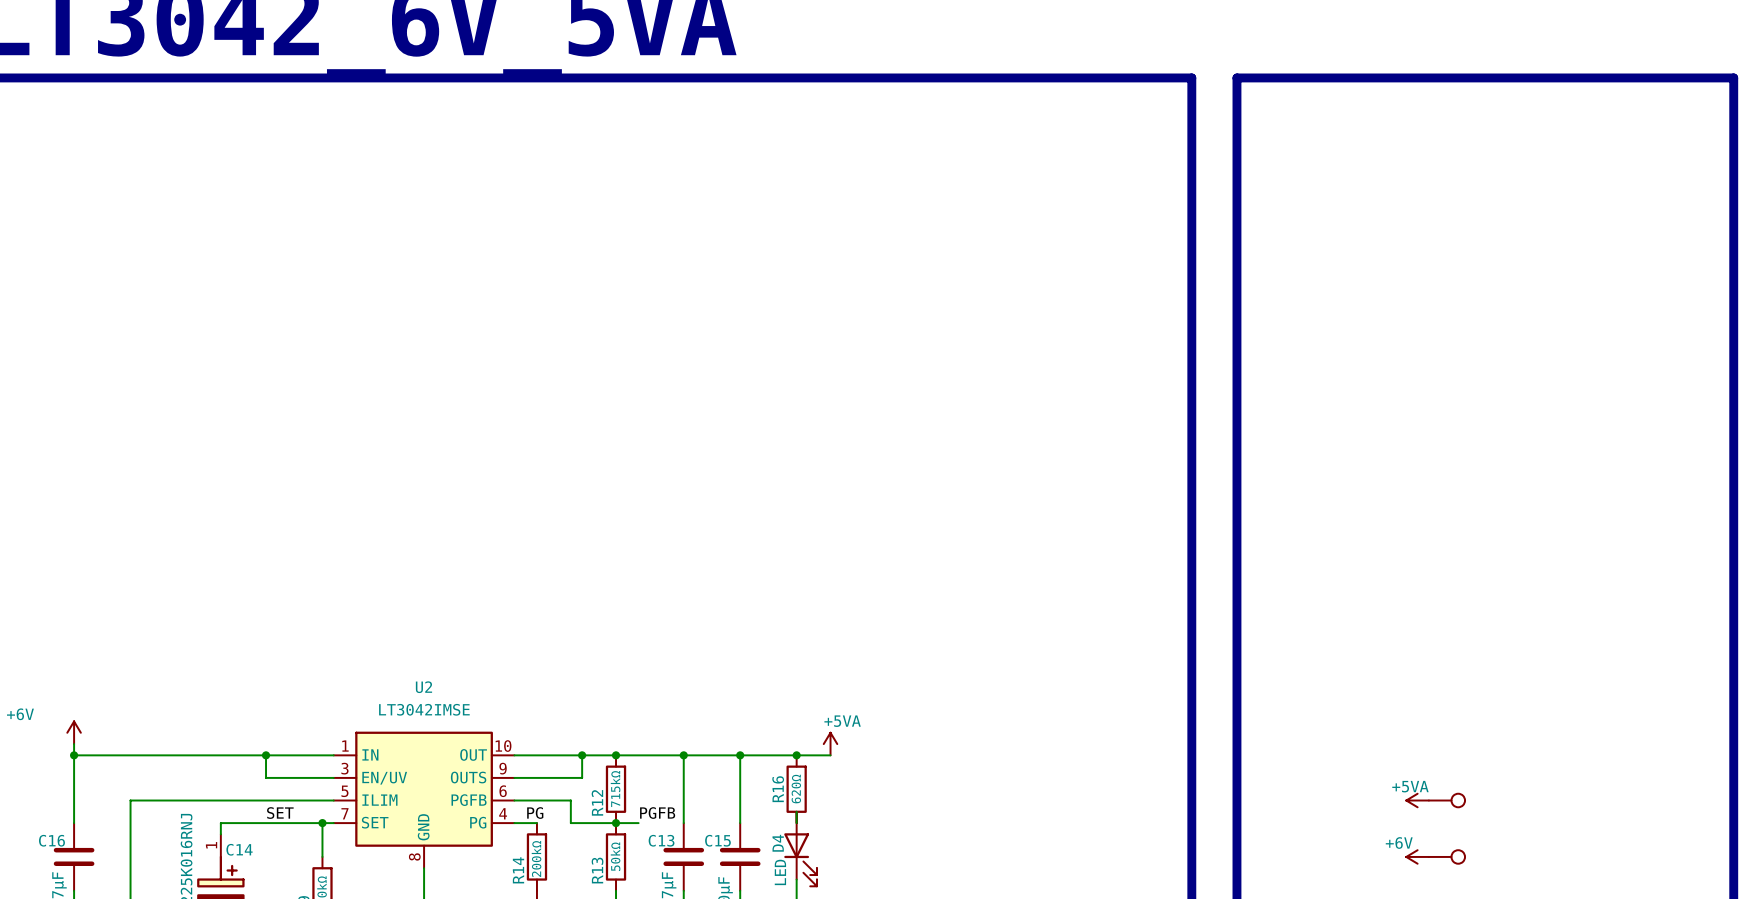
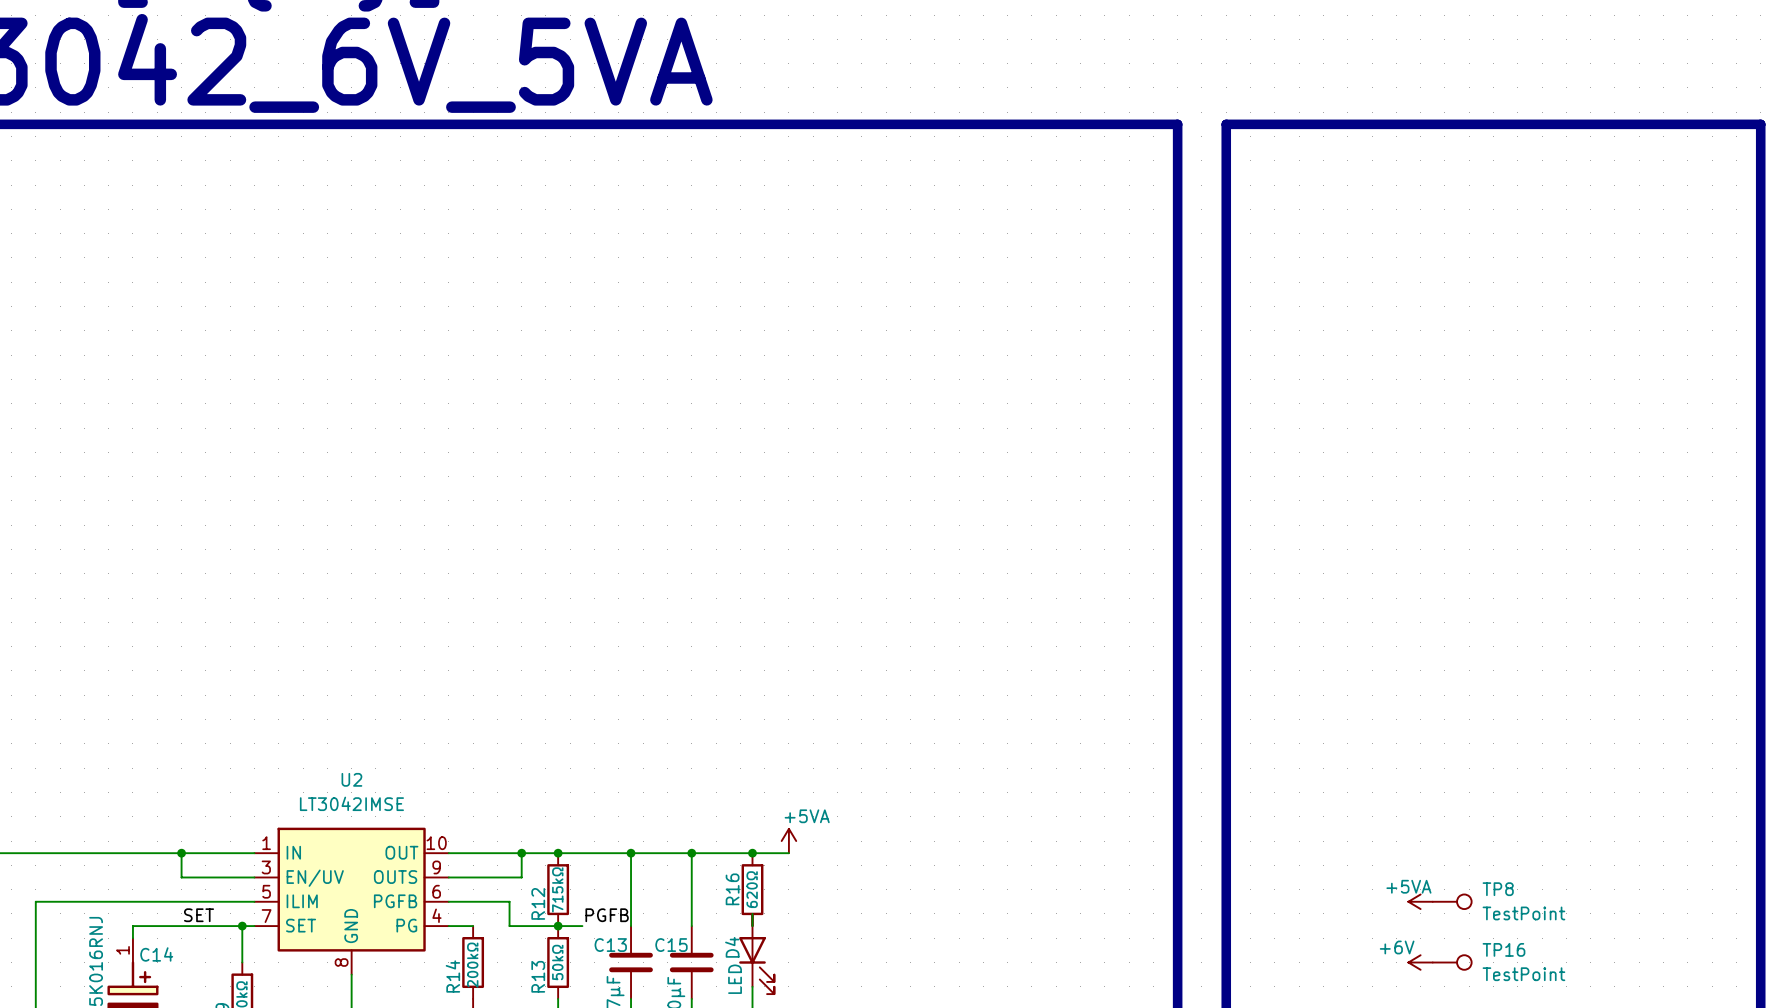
TP8 name: none -> TP8 (1498, 889)
TP8 value: none -> TestPoint (1523, 913)
label: PG (535, 813) -> none
TP16 name: none -> TP16 (1503, 949)
TP16 value: none -> TestPoint (1523, 974)

